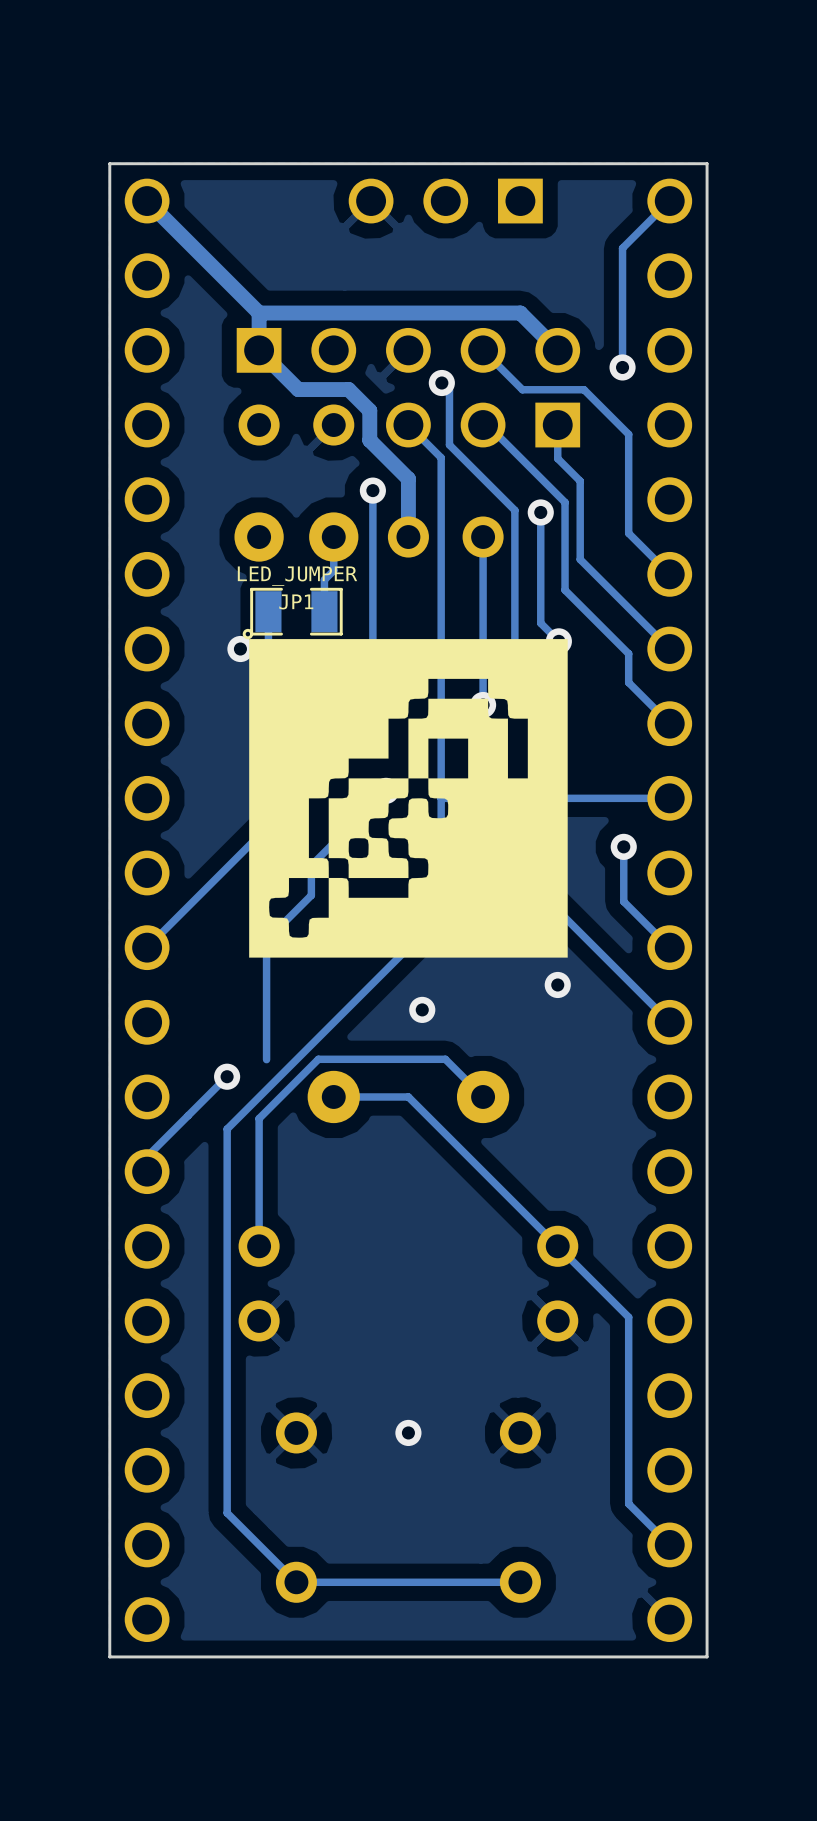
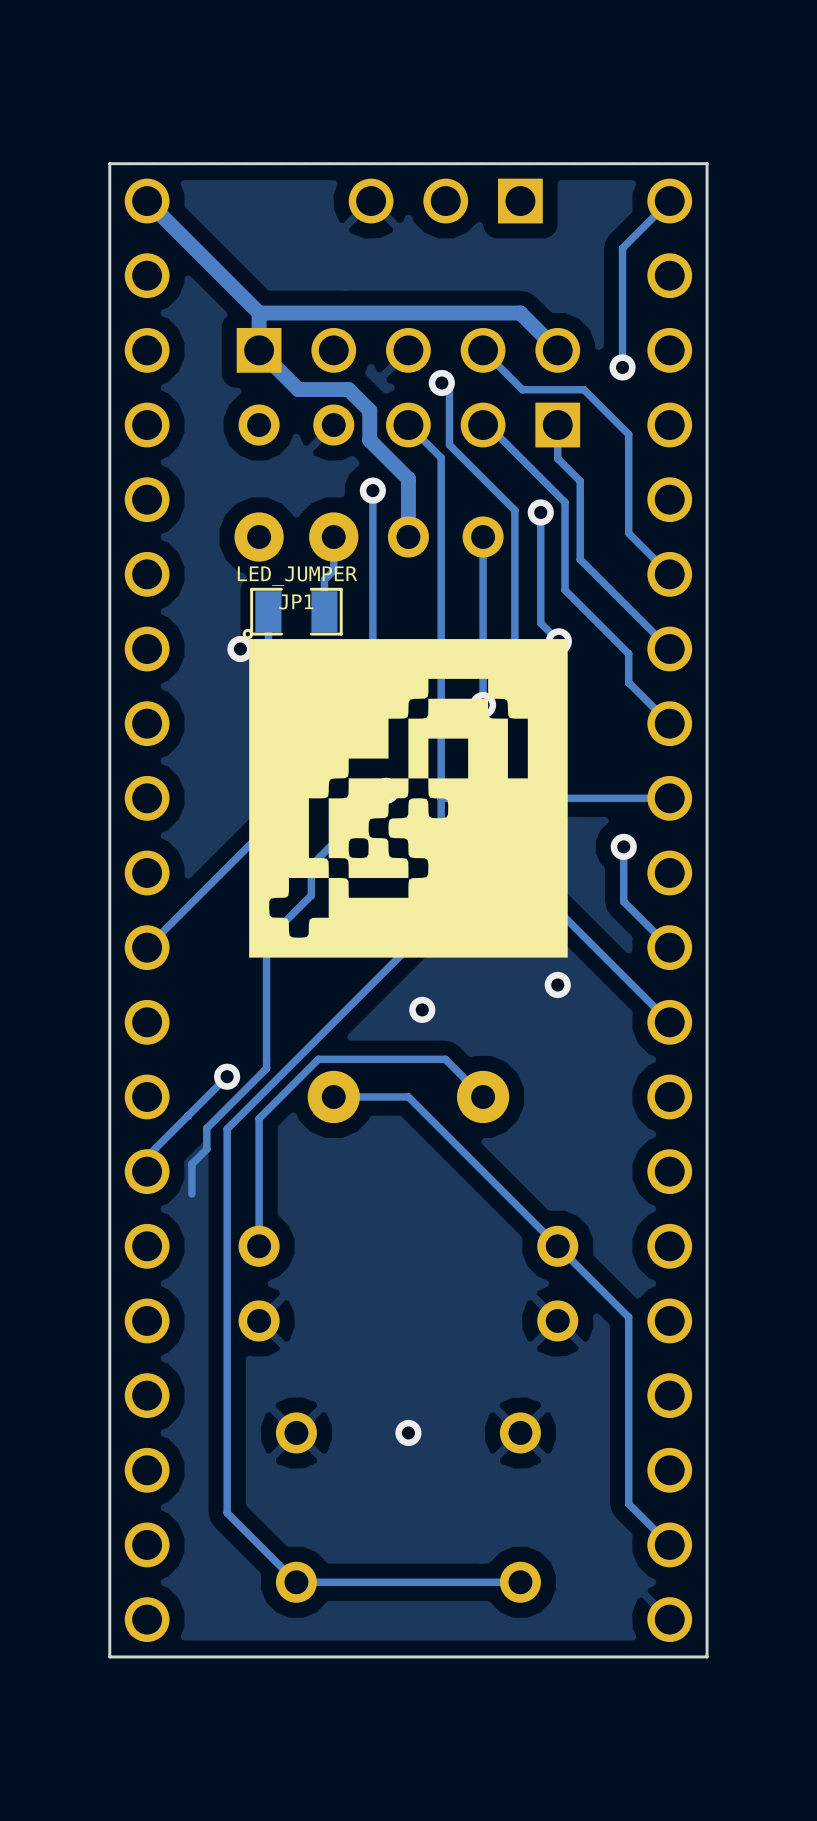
track: none -> (266, 1059) (266, 1068) (206, 1128) (206, 1149) (191, 1164) (191, 1194)

